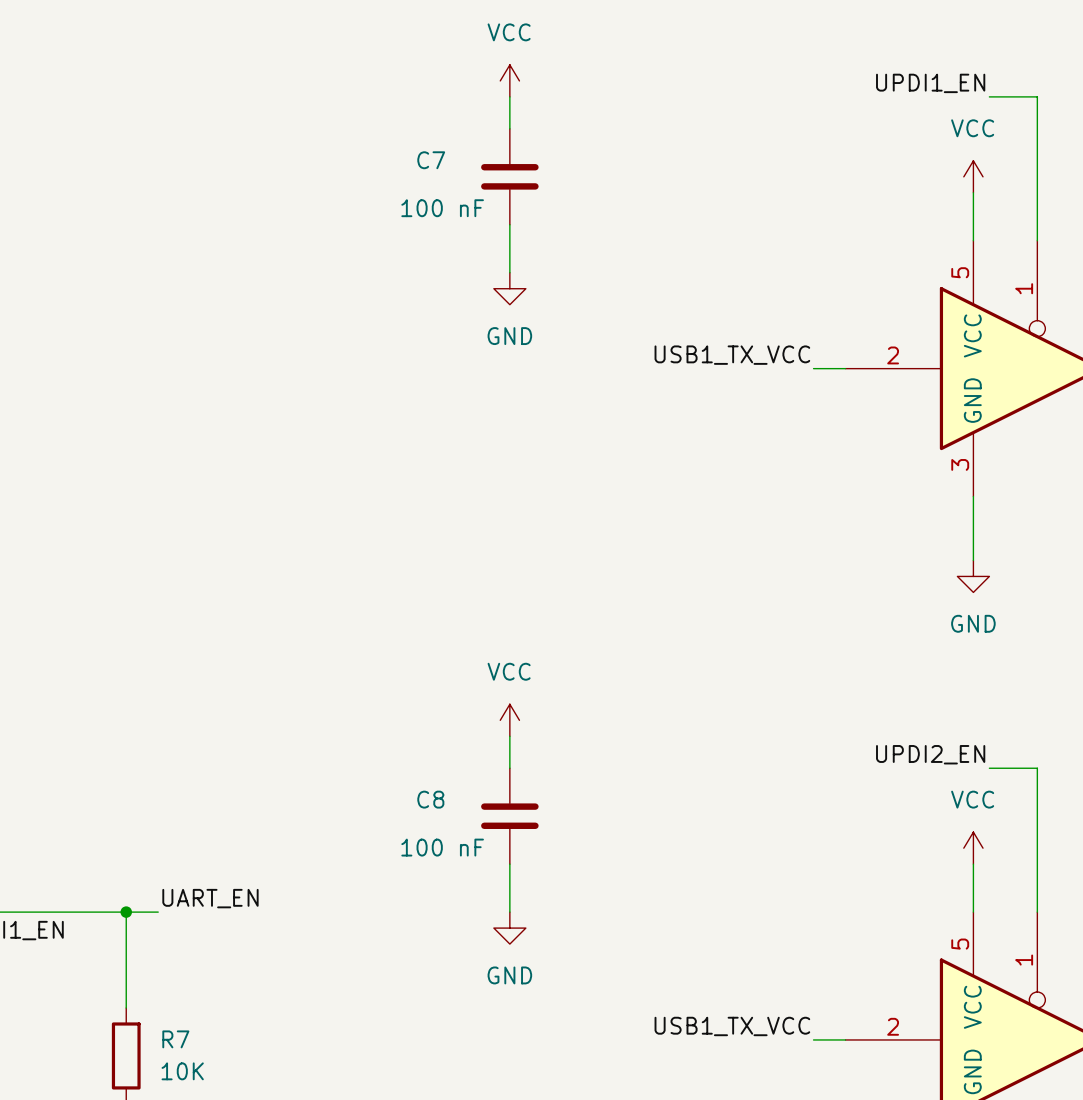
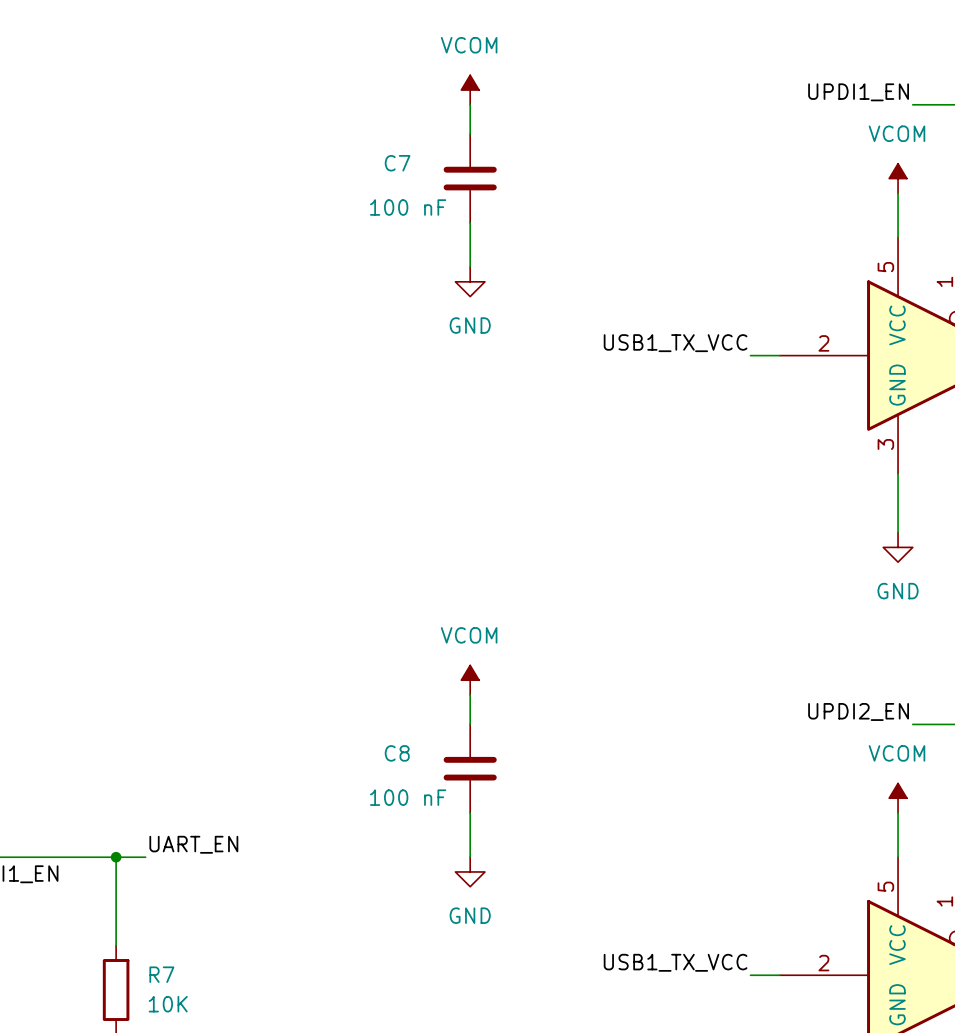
power symbol: VCC (509, 80) -> VCOM (470, 90)
power symbol: VCC (973, 176) -> VCOM (898, 178)
power symbol: VCC (509, 720) -> VCOM (470, 680)
power symbol: VCC (973, 848) -> VCOM (898, 798)

